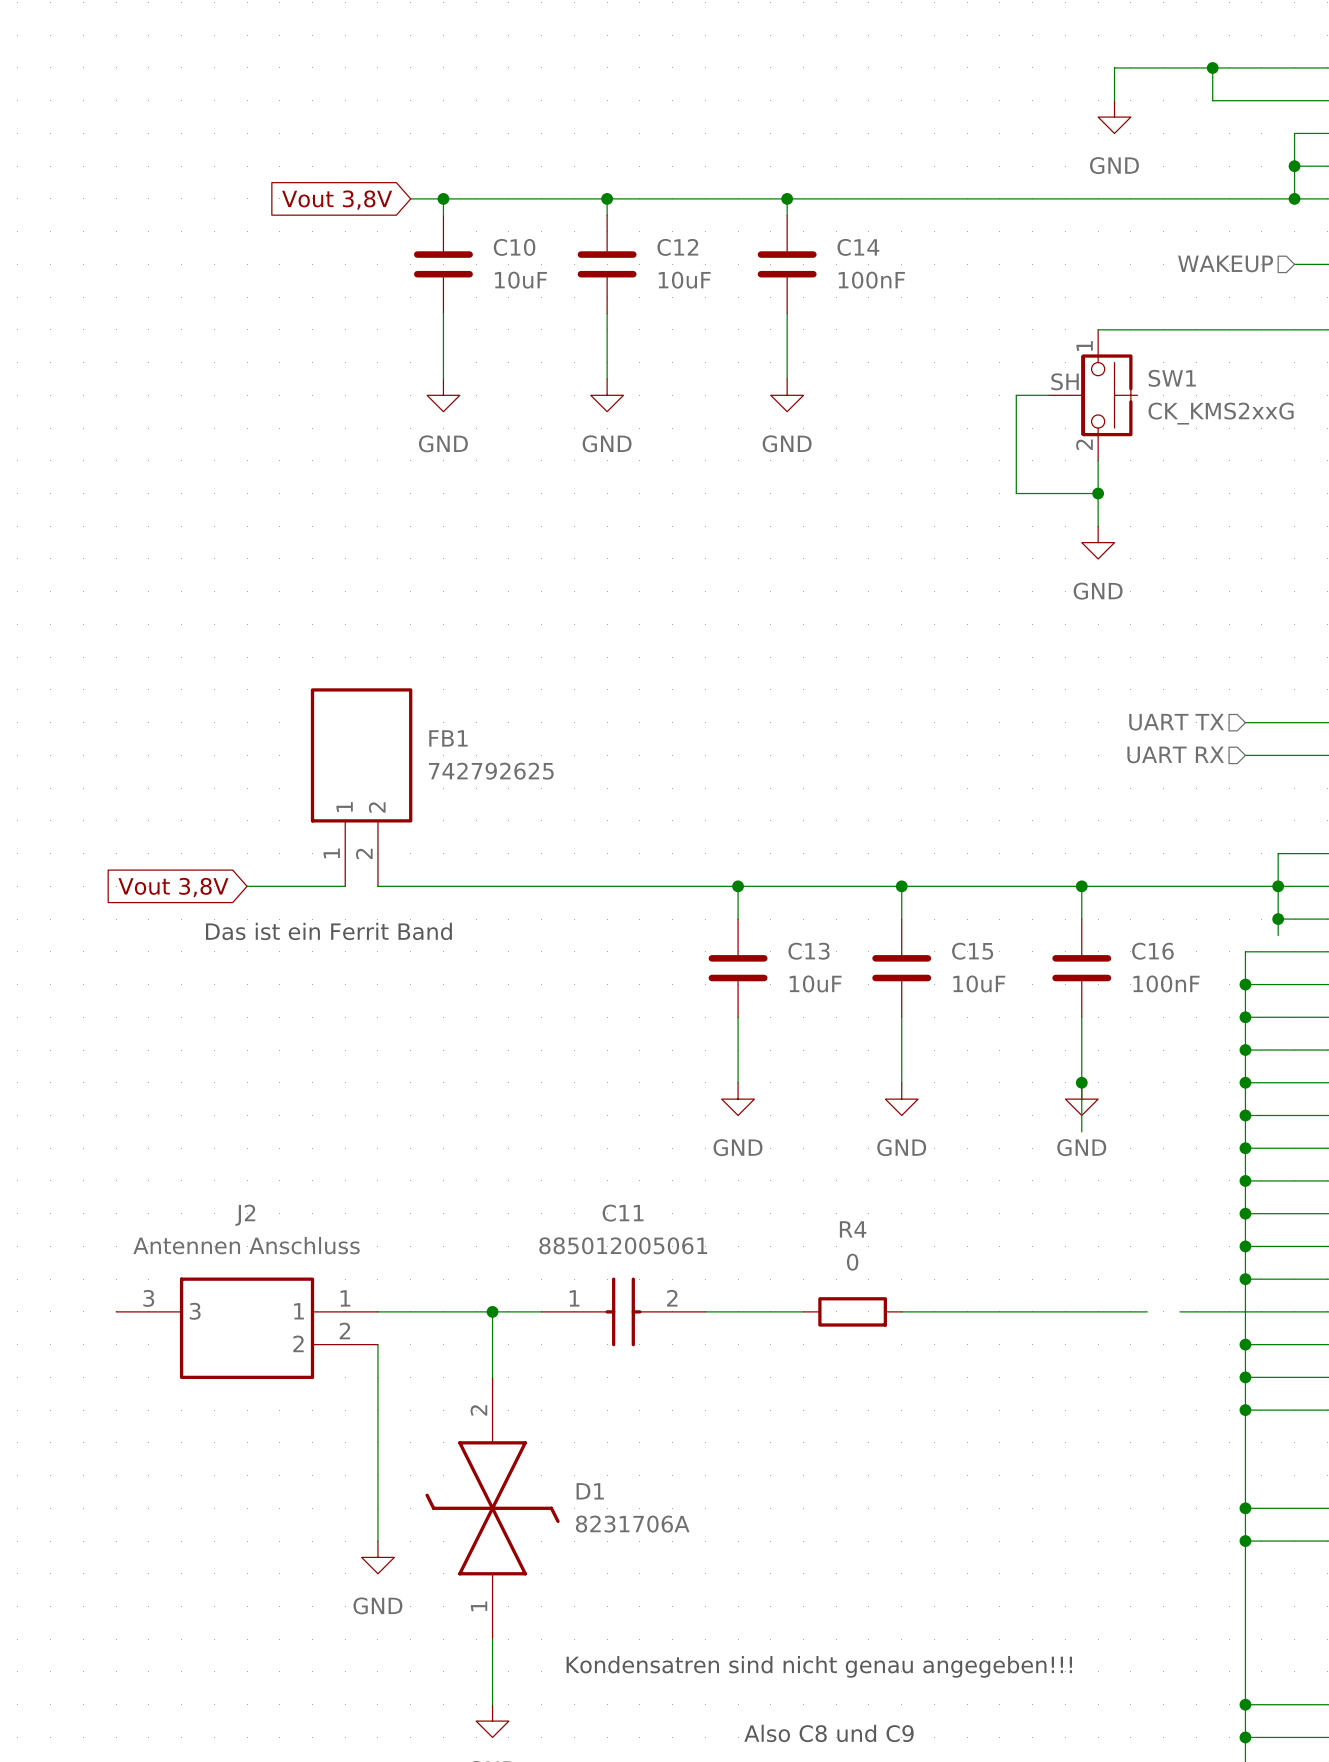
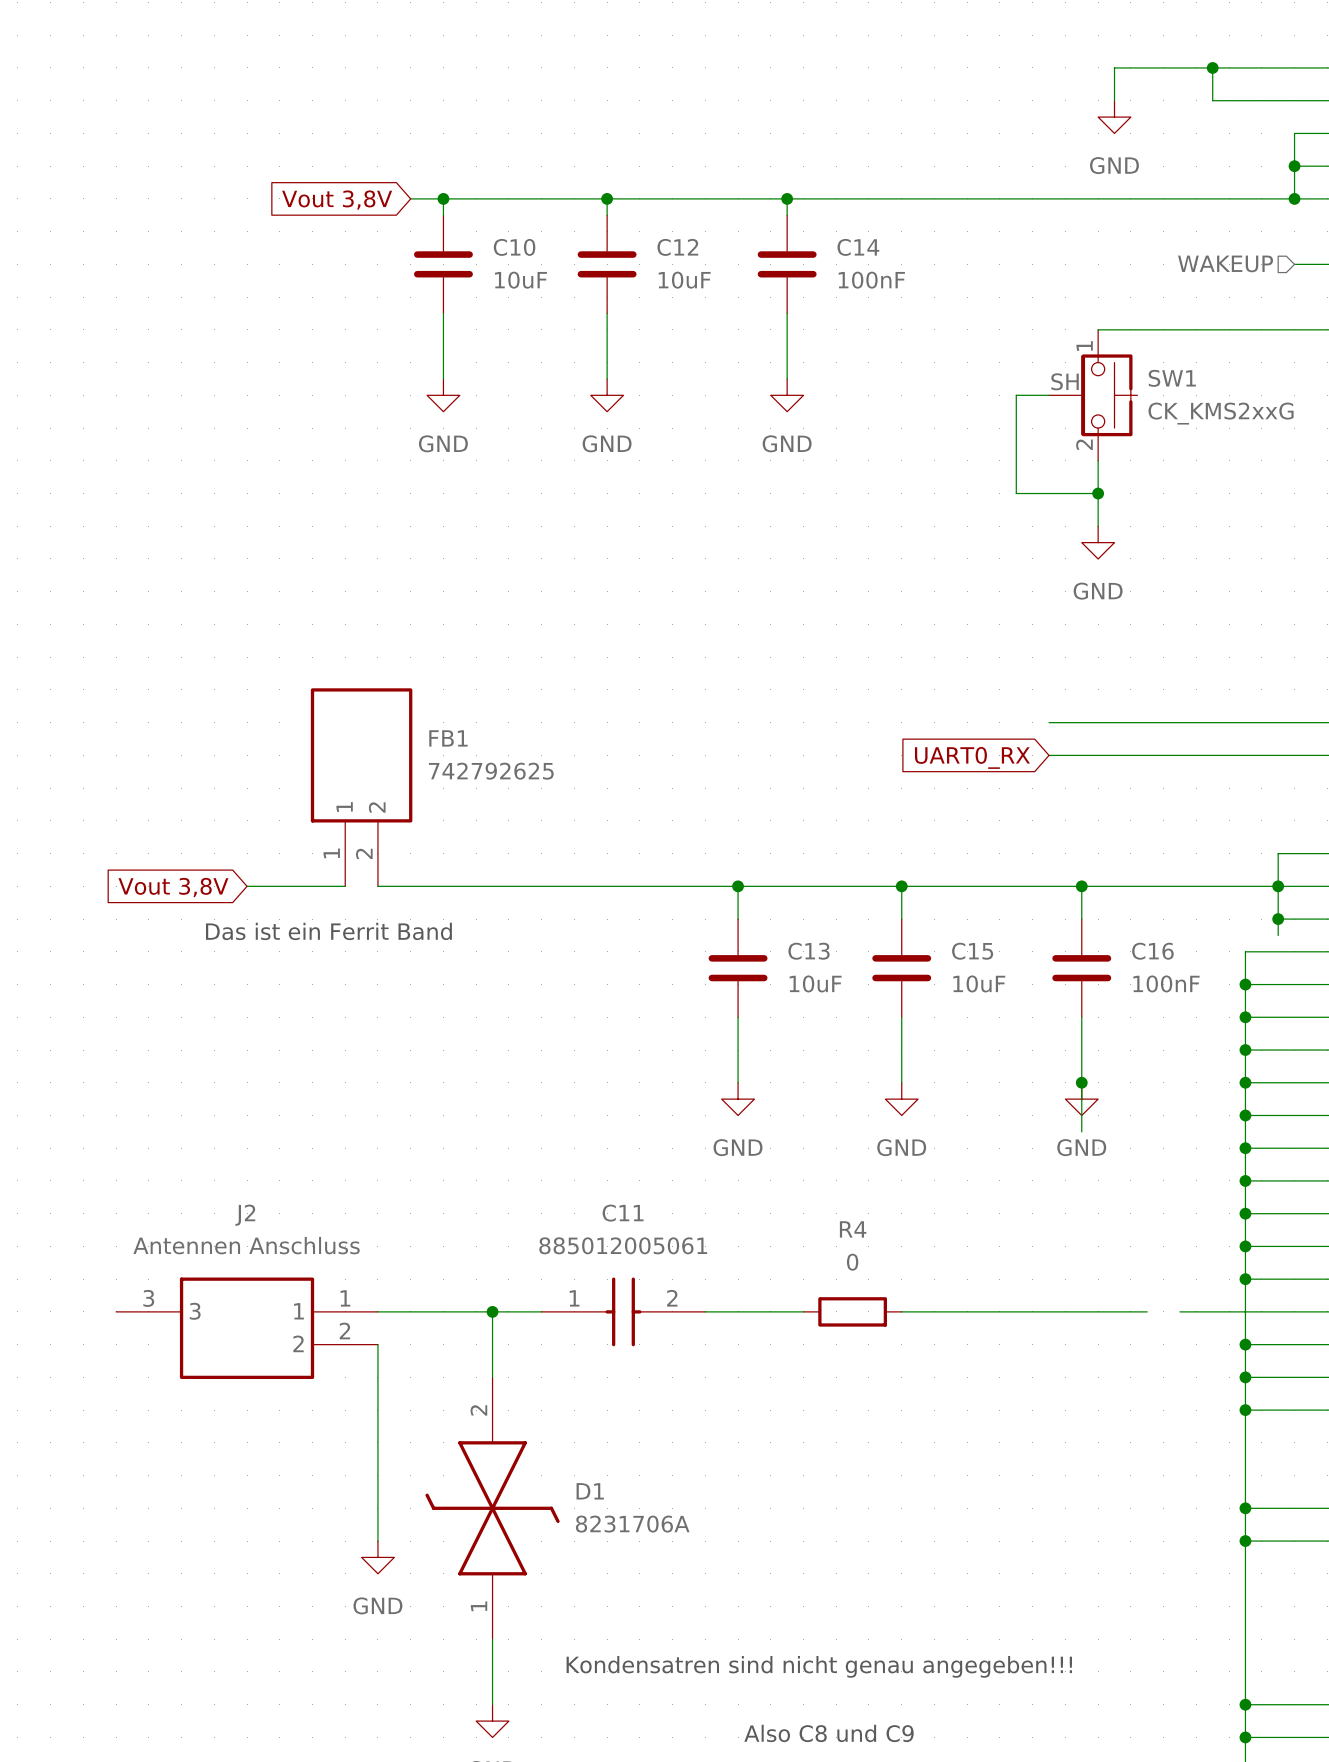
wire: none -> (1049, 722) (1245, 722)
hierarchical label: UART TX (1176, 722) -> none
hierarchical label: UART RX (1175, 754) -> none
wire: none -> (1049, 755) (1245, 755)
global label: none -> UART0_RX (972, 757)

